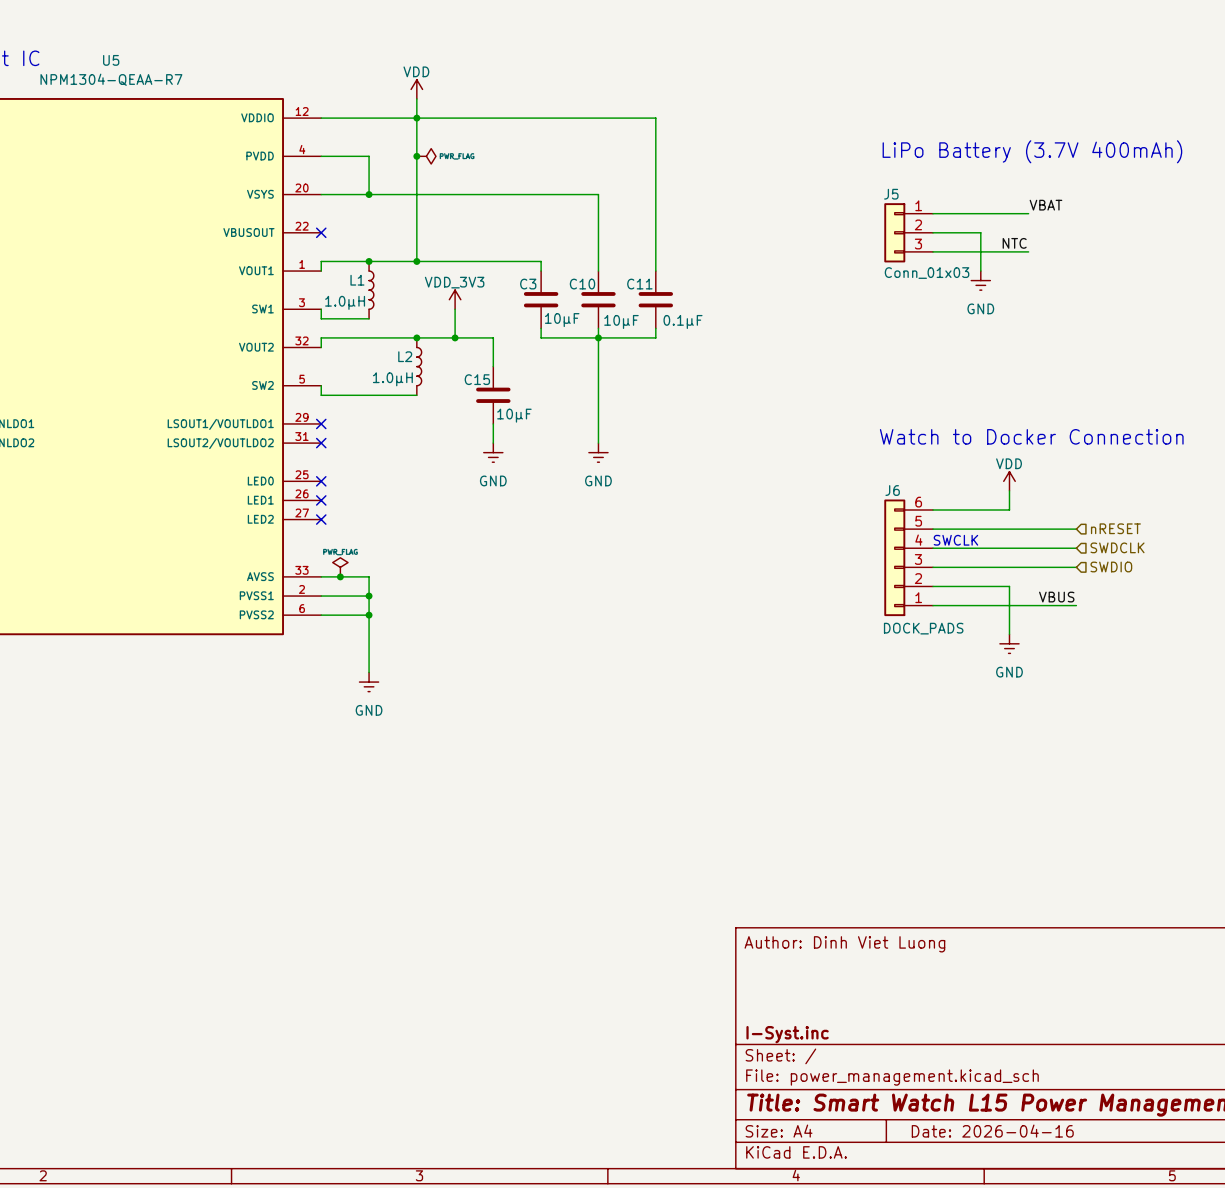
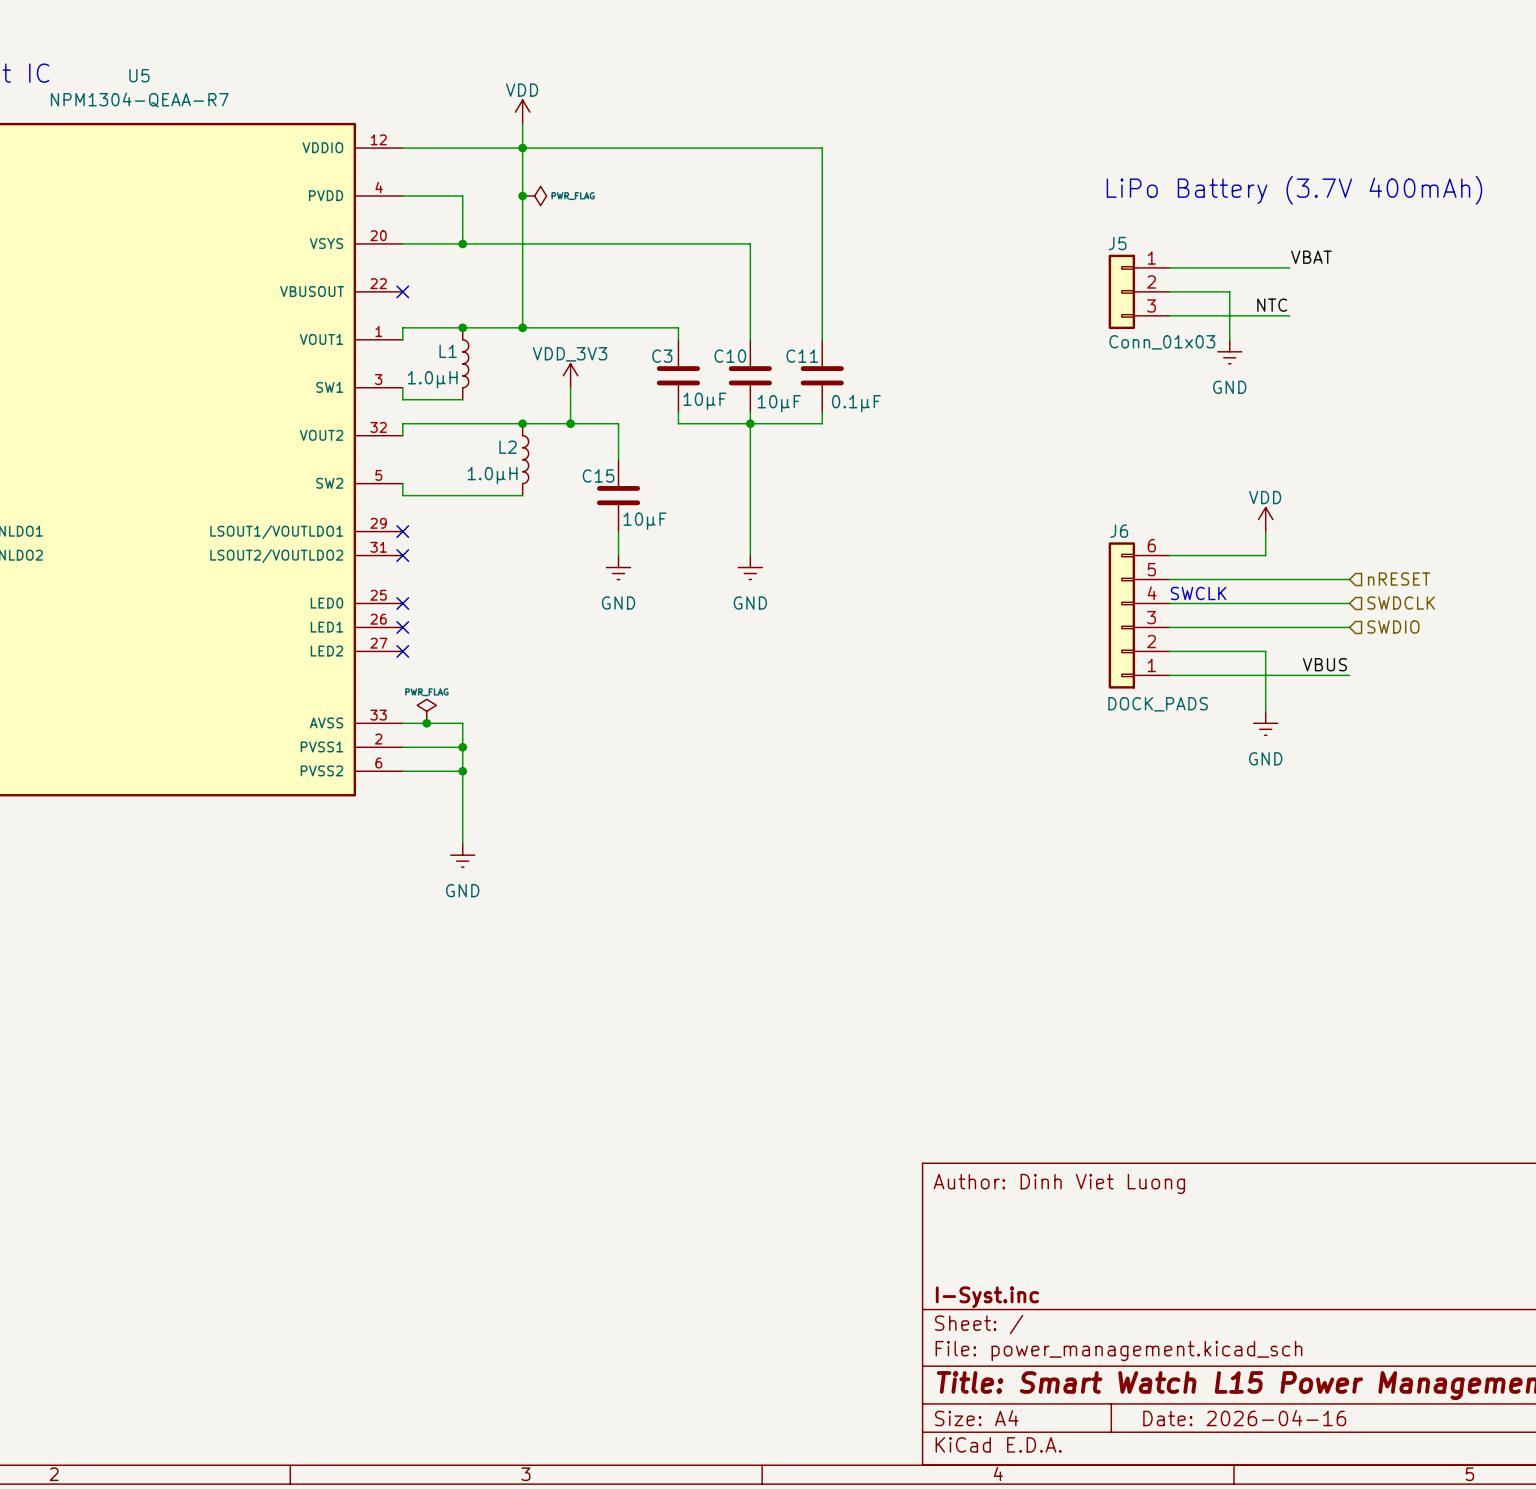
text: Watch to Docker Connection (1031, 436) -> none
power symbol position: VDD (1009, 481) -> VDD (1265, 519)
wire: (1009, 490) (1009, 510) (933, 510) -> (1265, 531) (1265, 555) (1169, 555)
hierarchical label position: nRESET (1115, 528) -> nRESET (1399, 579)
wire: (933, 529) (1076, 529) -> (1169, 579) (1349, 579)
text position: SWCLK (955, 540) -> SWCLK (1198, 593)
hierarchical label position: SWDCLK (1117, 547) -> SWDCLK (1401, 603)
wire: (933, 548) (1076, 548) -> (1169, 603) (1349, 603)
J6 position: (908, 557) -> (1139, 615)
hierarchical label position: SWDIO (1111, 566) -> SWDIO (1393, 627)
wire: (933, 567) (1076, 567) -> (1169, 627) (1349, 627)
wire: (933, 586) (1009, 586) (1009, 634) -> (1169, 651) (1265, 651) (1265, 711)
label position: VBUS (1056, 597) -> VBUS (1324, 664)
wire: (933, 605) (1076, 605) -> (1169, 675) (1349, 675)
power symbol position: GND (1009, 643) -> GND (1265, 723)

